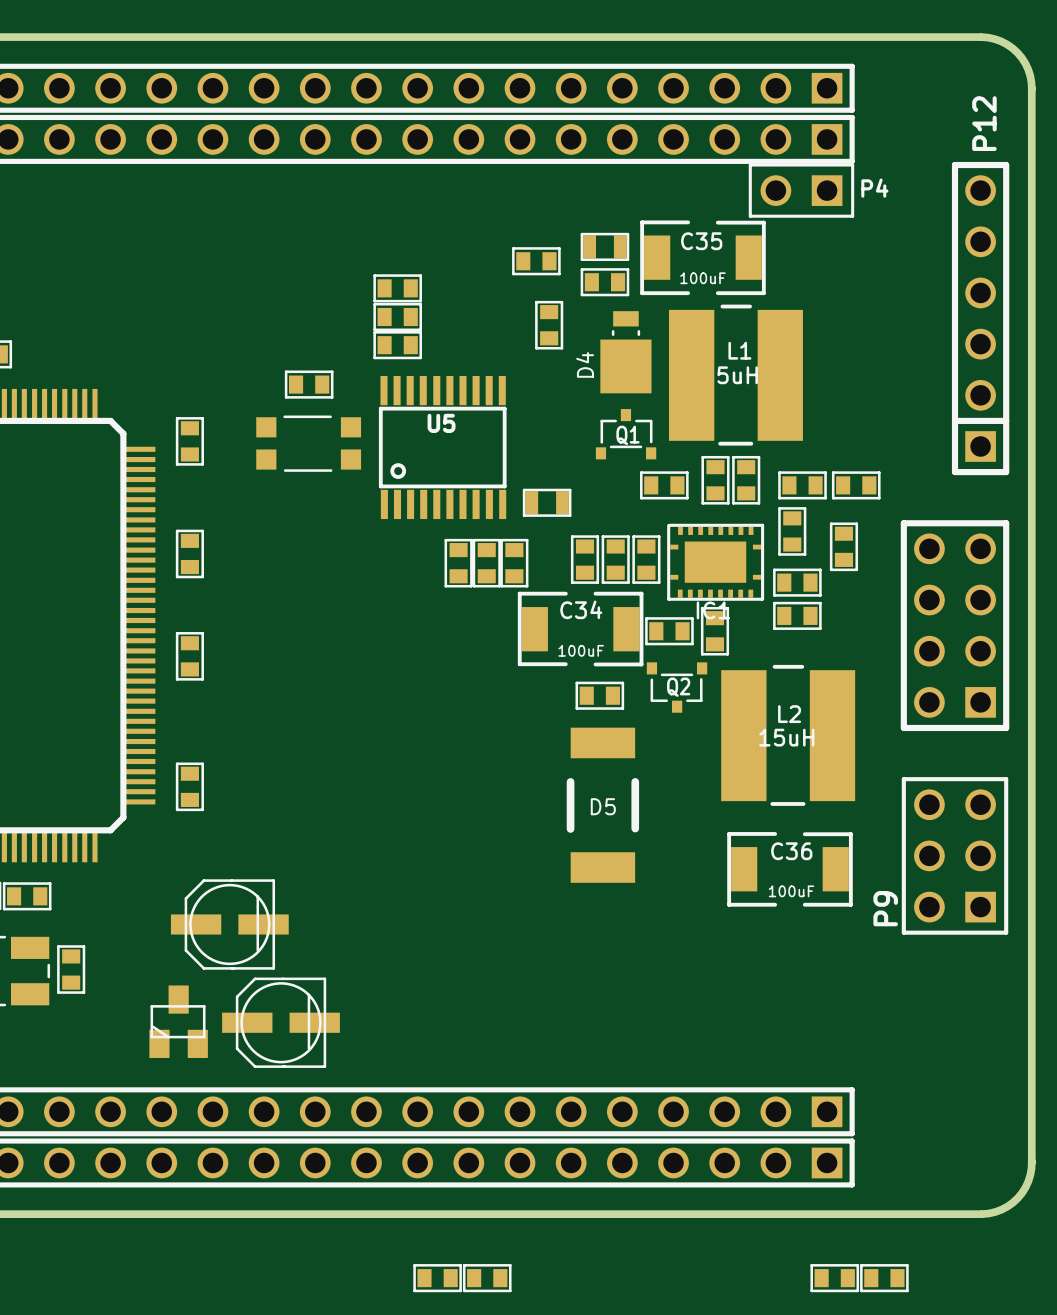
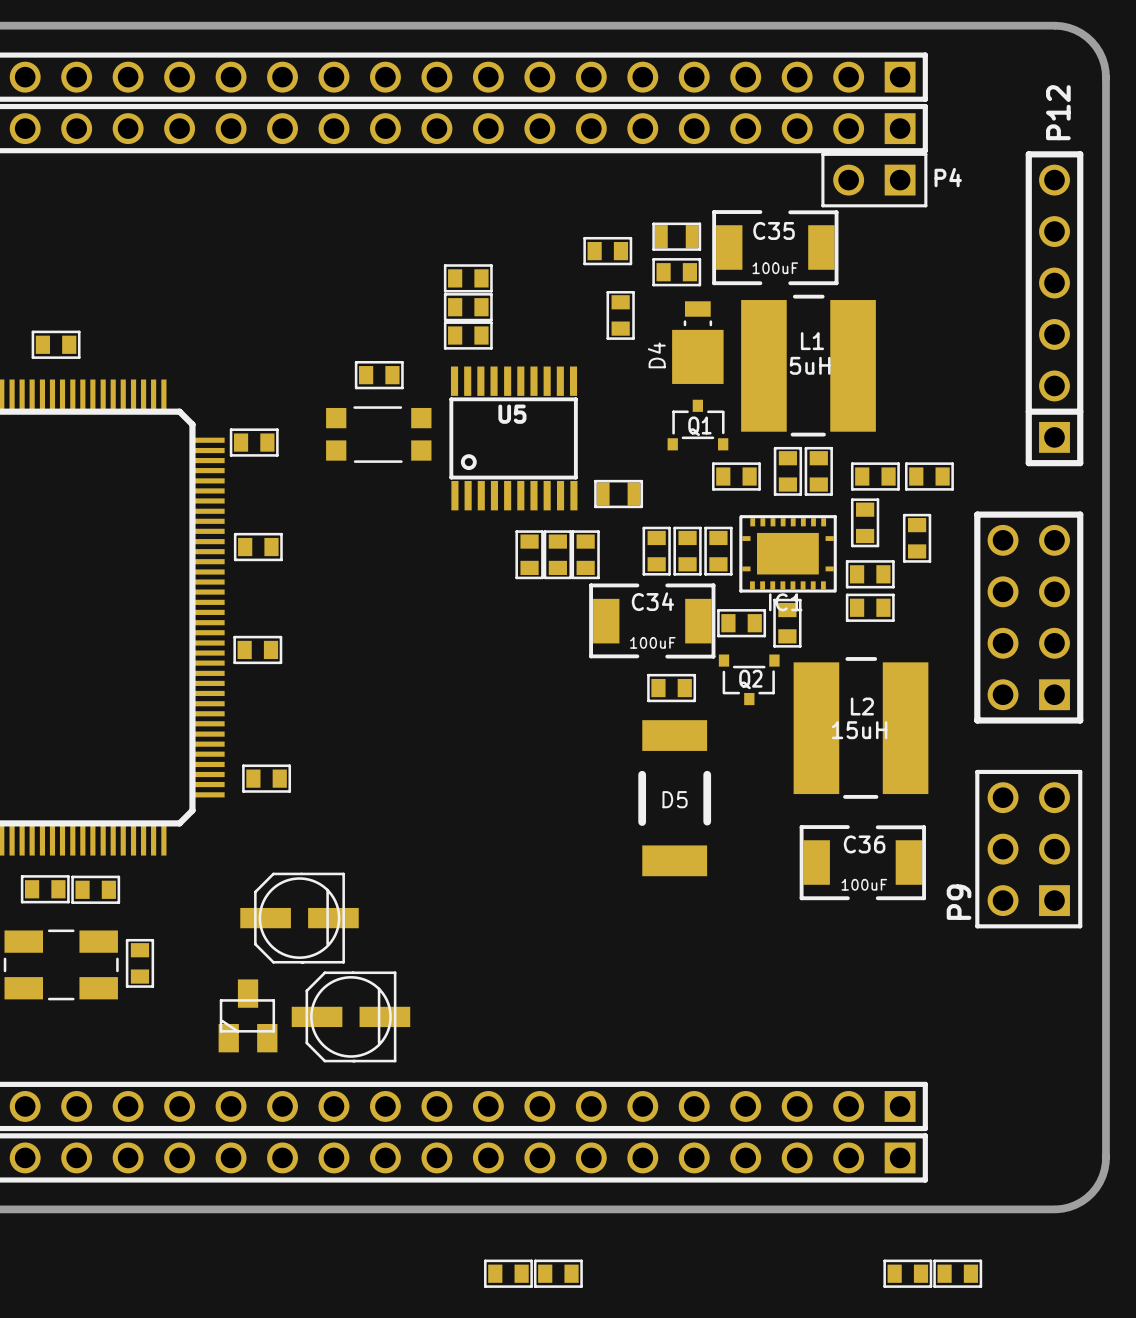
part rotation: 0° (189, 441) -> 90° clockwise (254, 442)
part rotation: 0° (189, 553) -> 90° clockwise (258, 547)
part rotation: 0° (189, 656) -> 90° clockwise (257, 649)
part rotation: 0° (189, 786) -> 90° clockwise (266, 778)

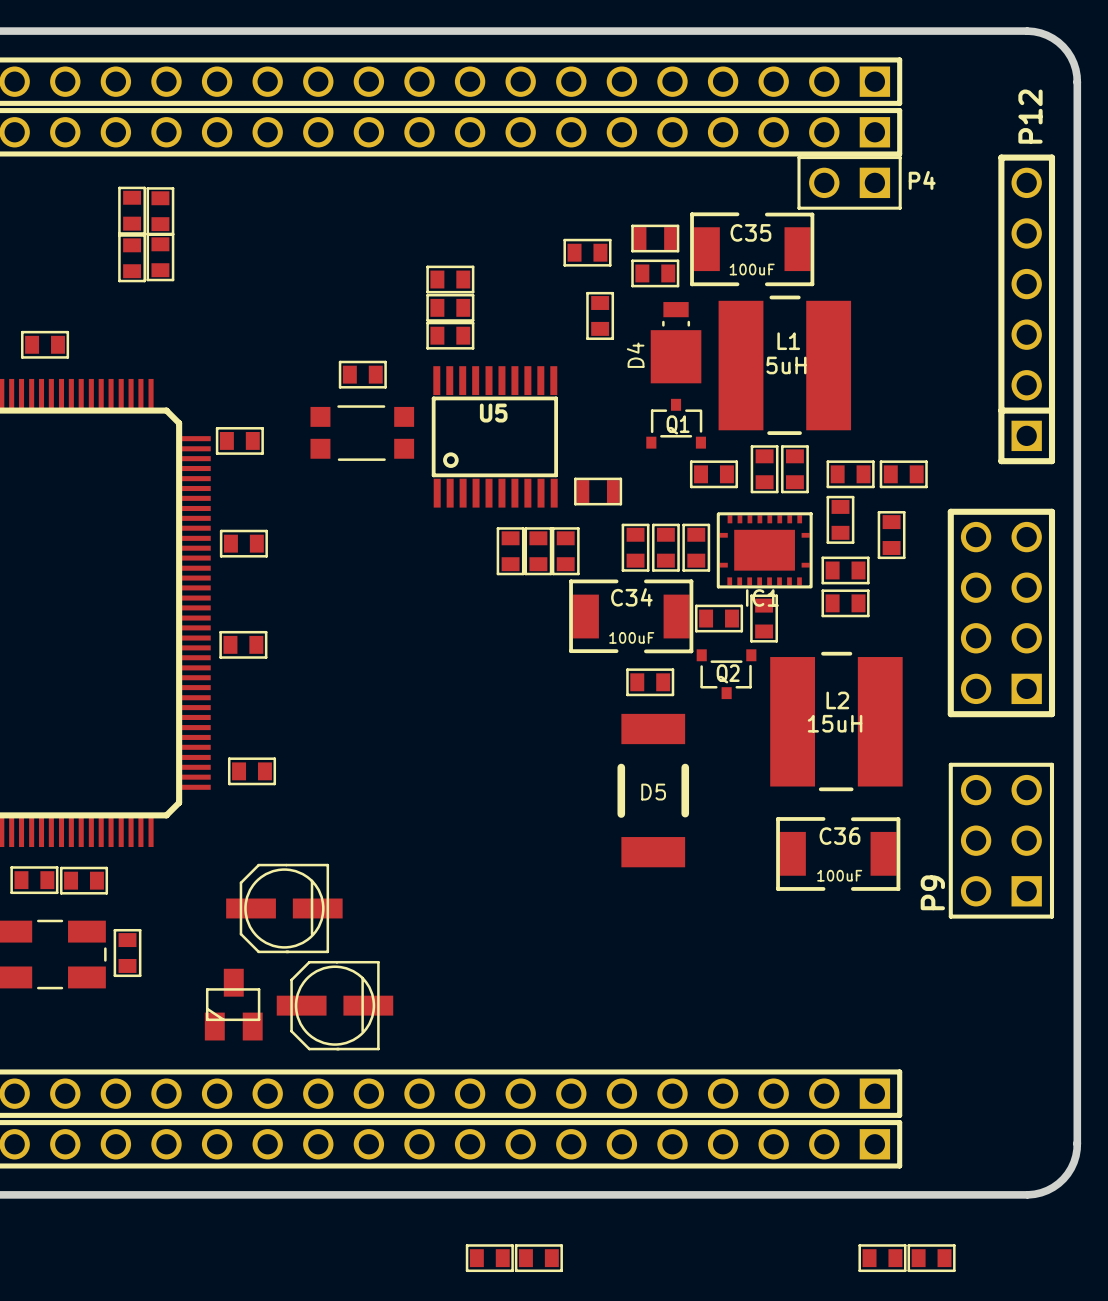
part: none -> (132, 210)
part: none -> (160, 211)
part: none -> (160, 257)
part: none -> (132, 258)

